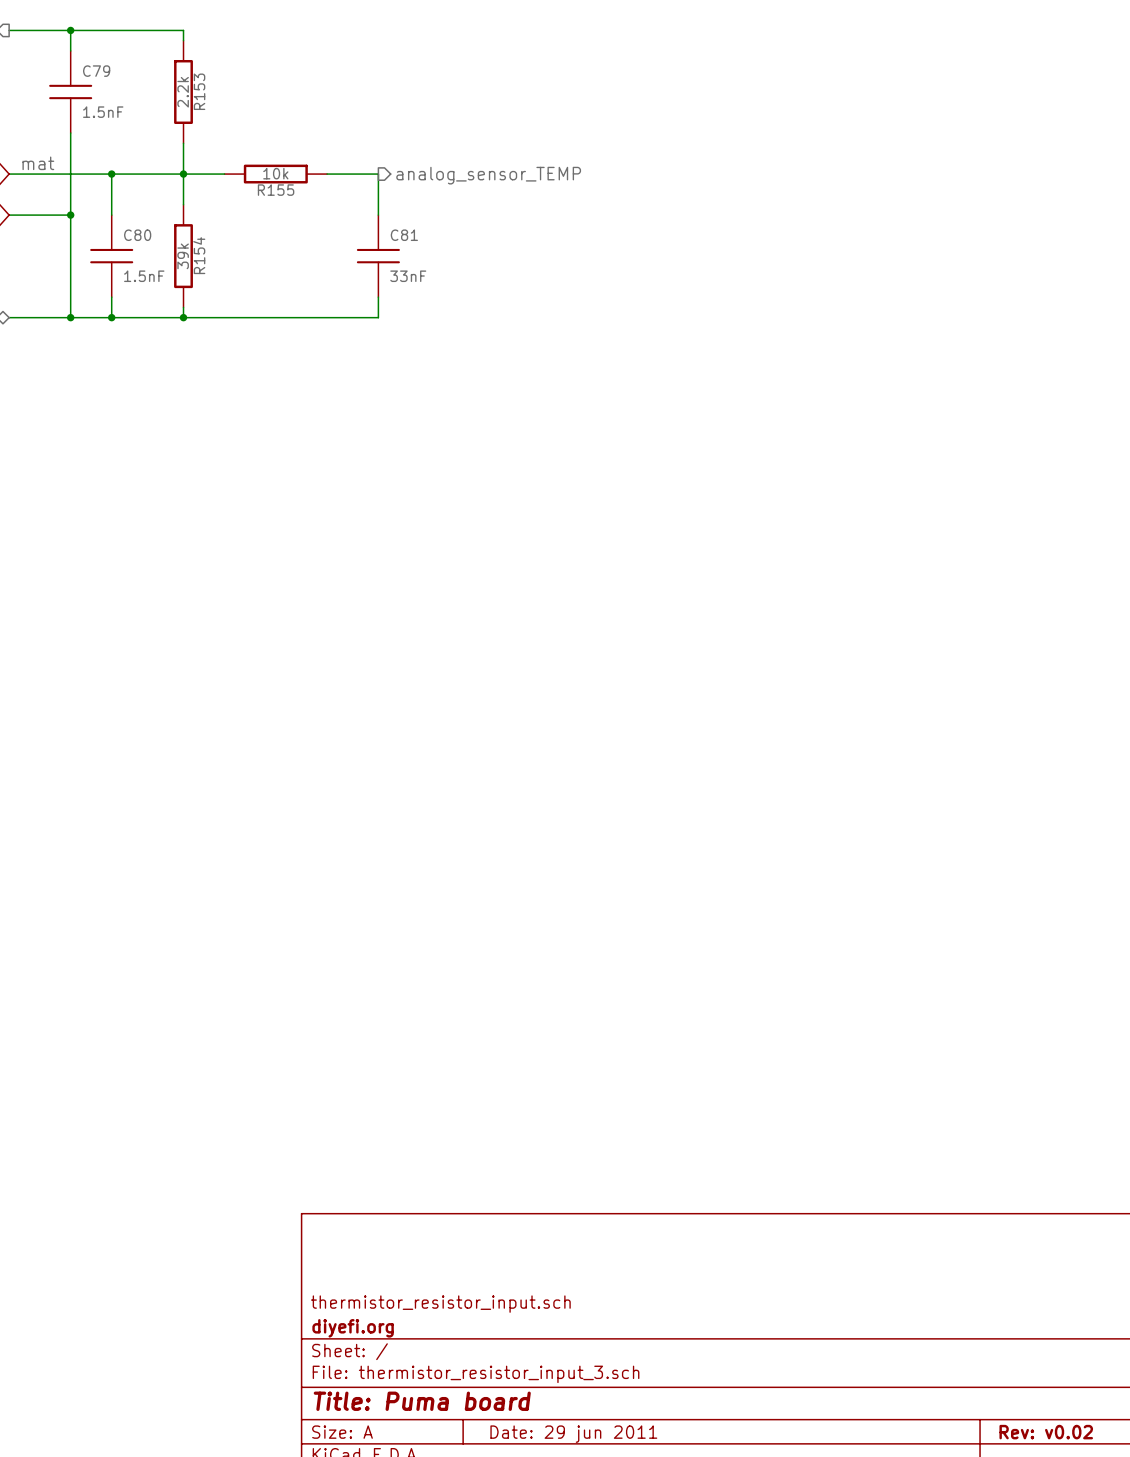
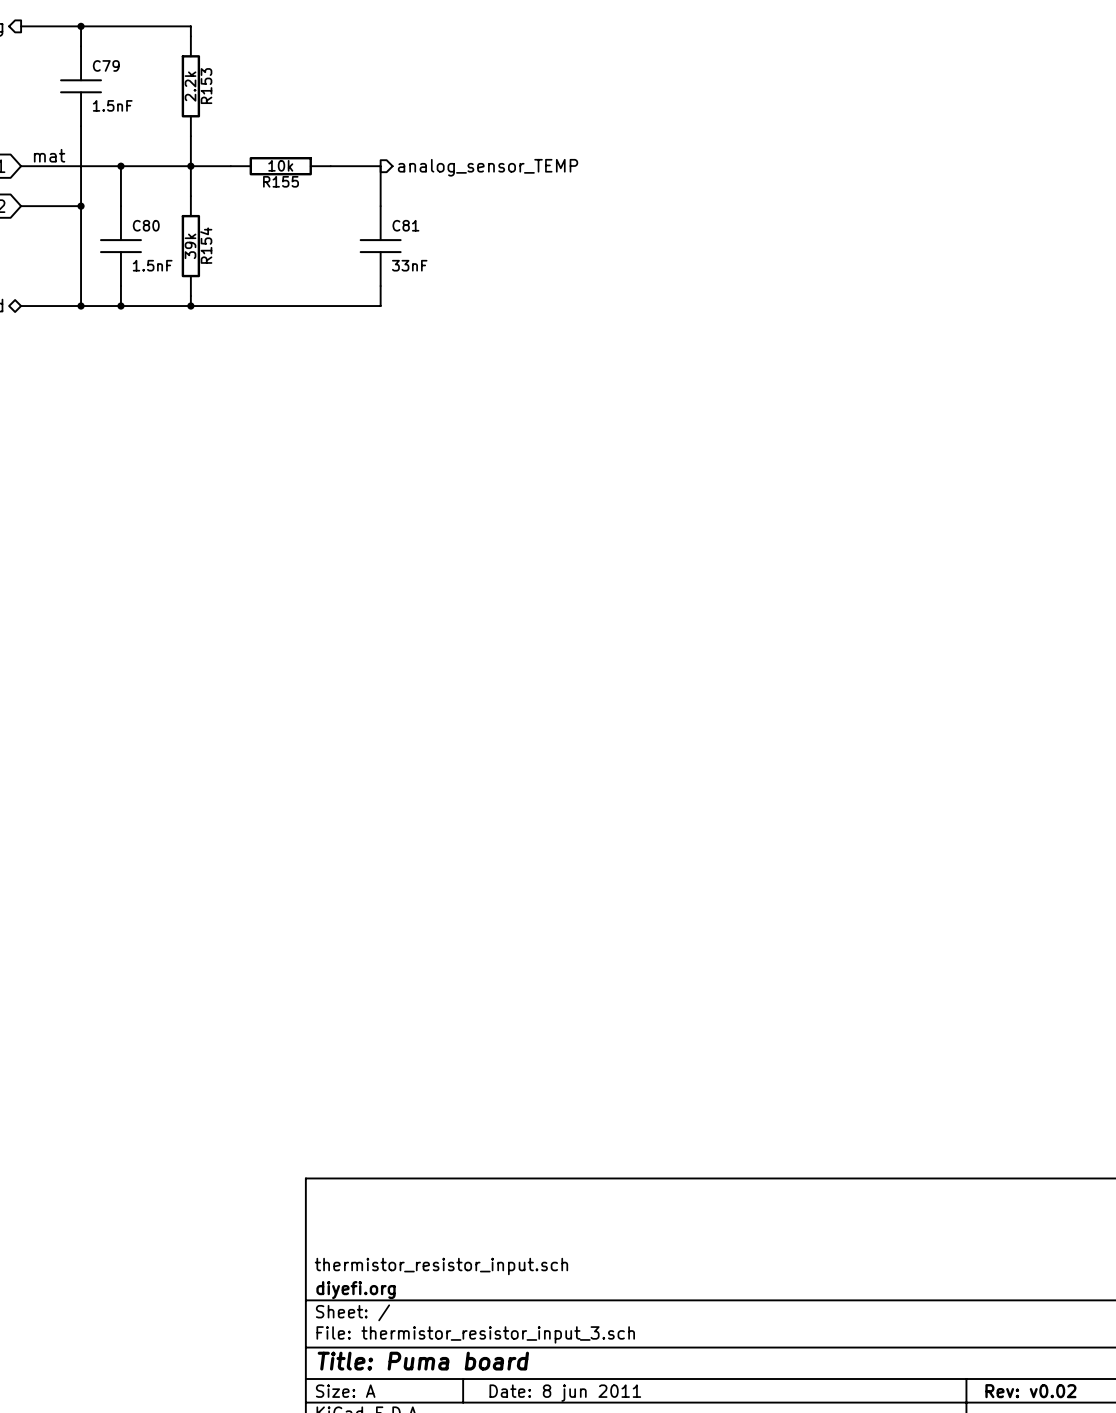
title block: Date: 29 jun 2011 (573, 1434) -> Date: 8 jun 2011 (565, 1393)

